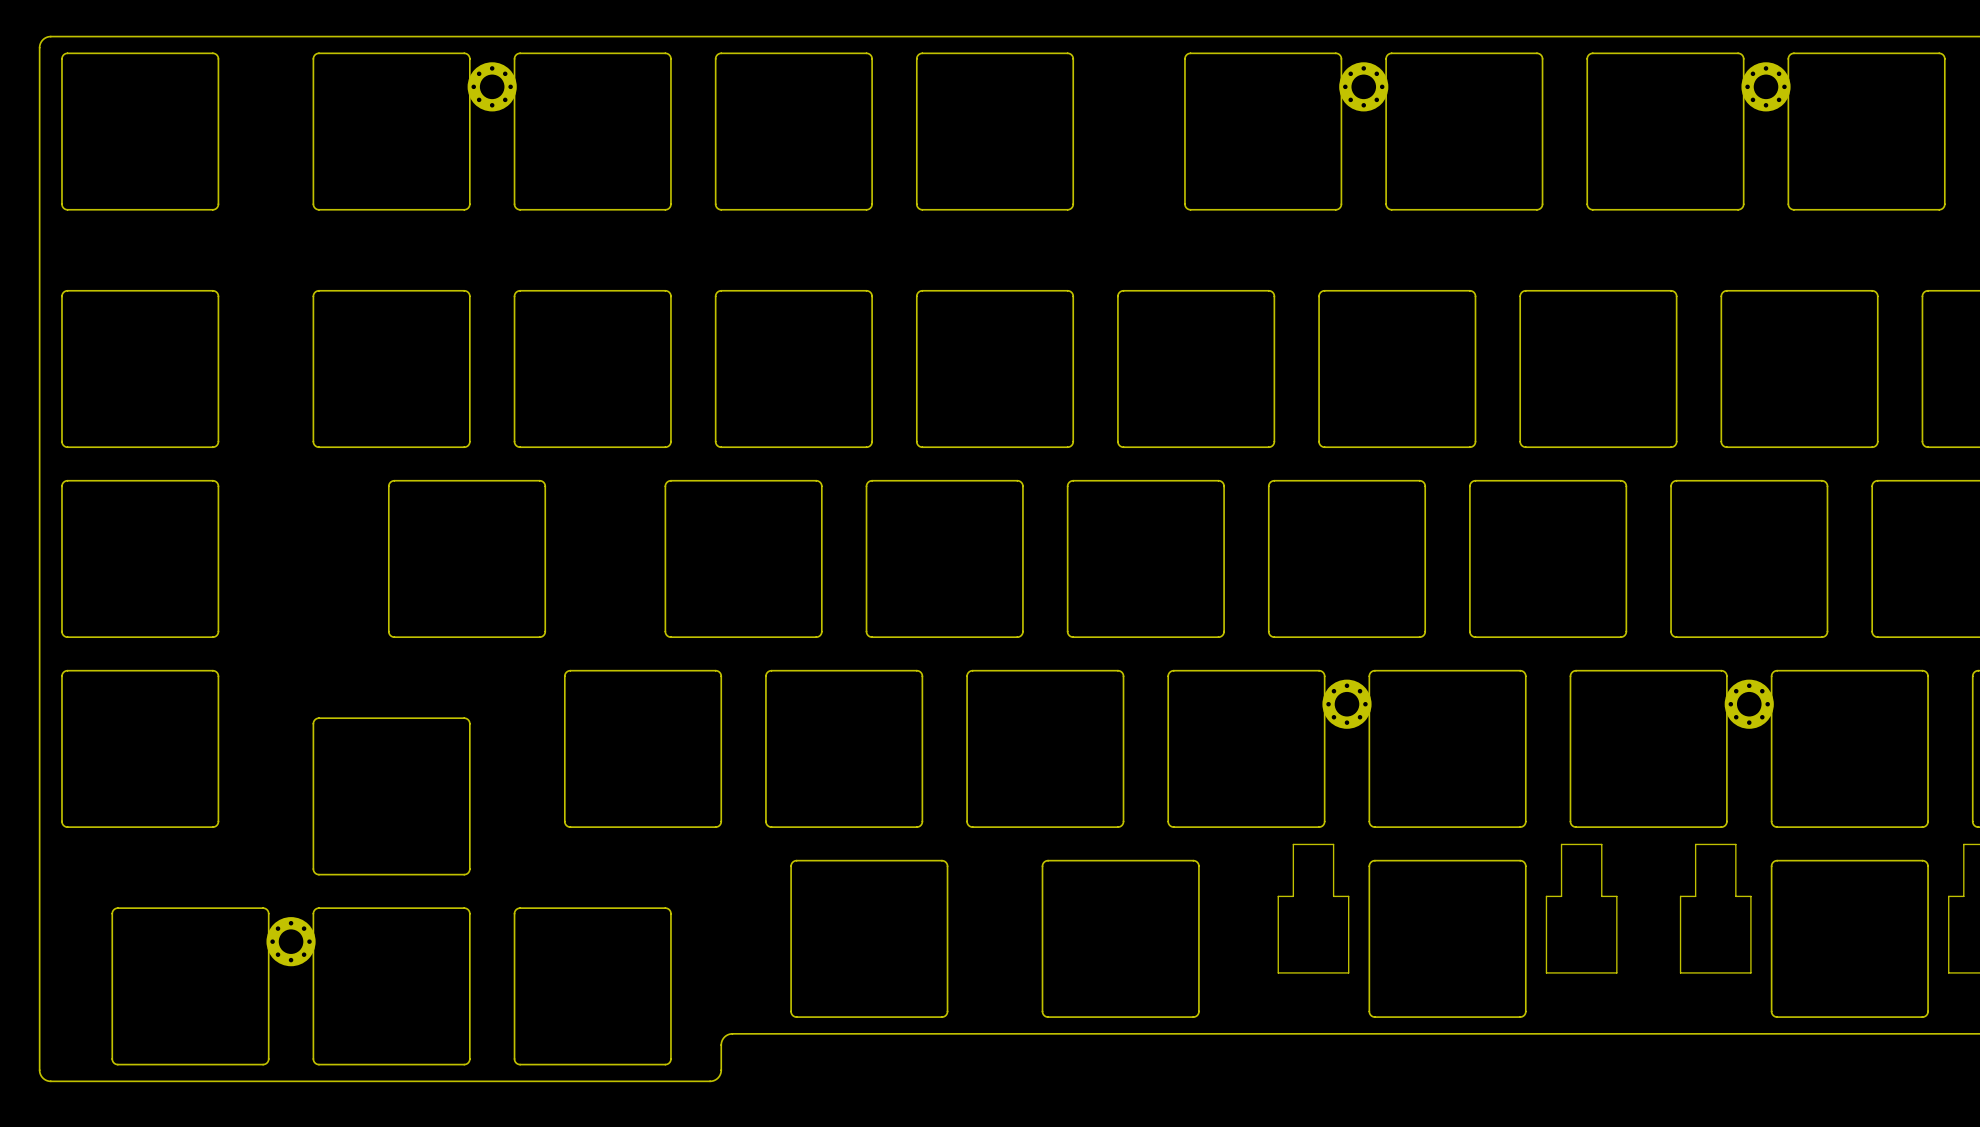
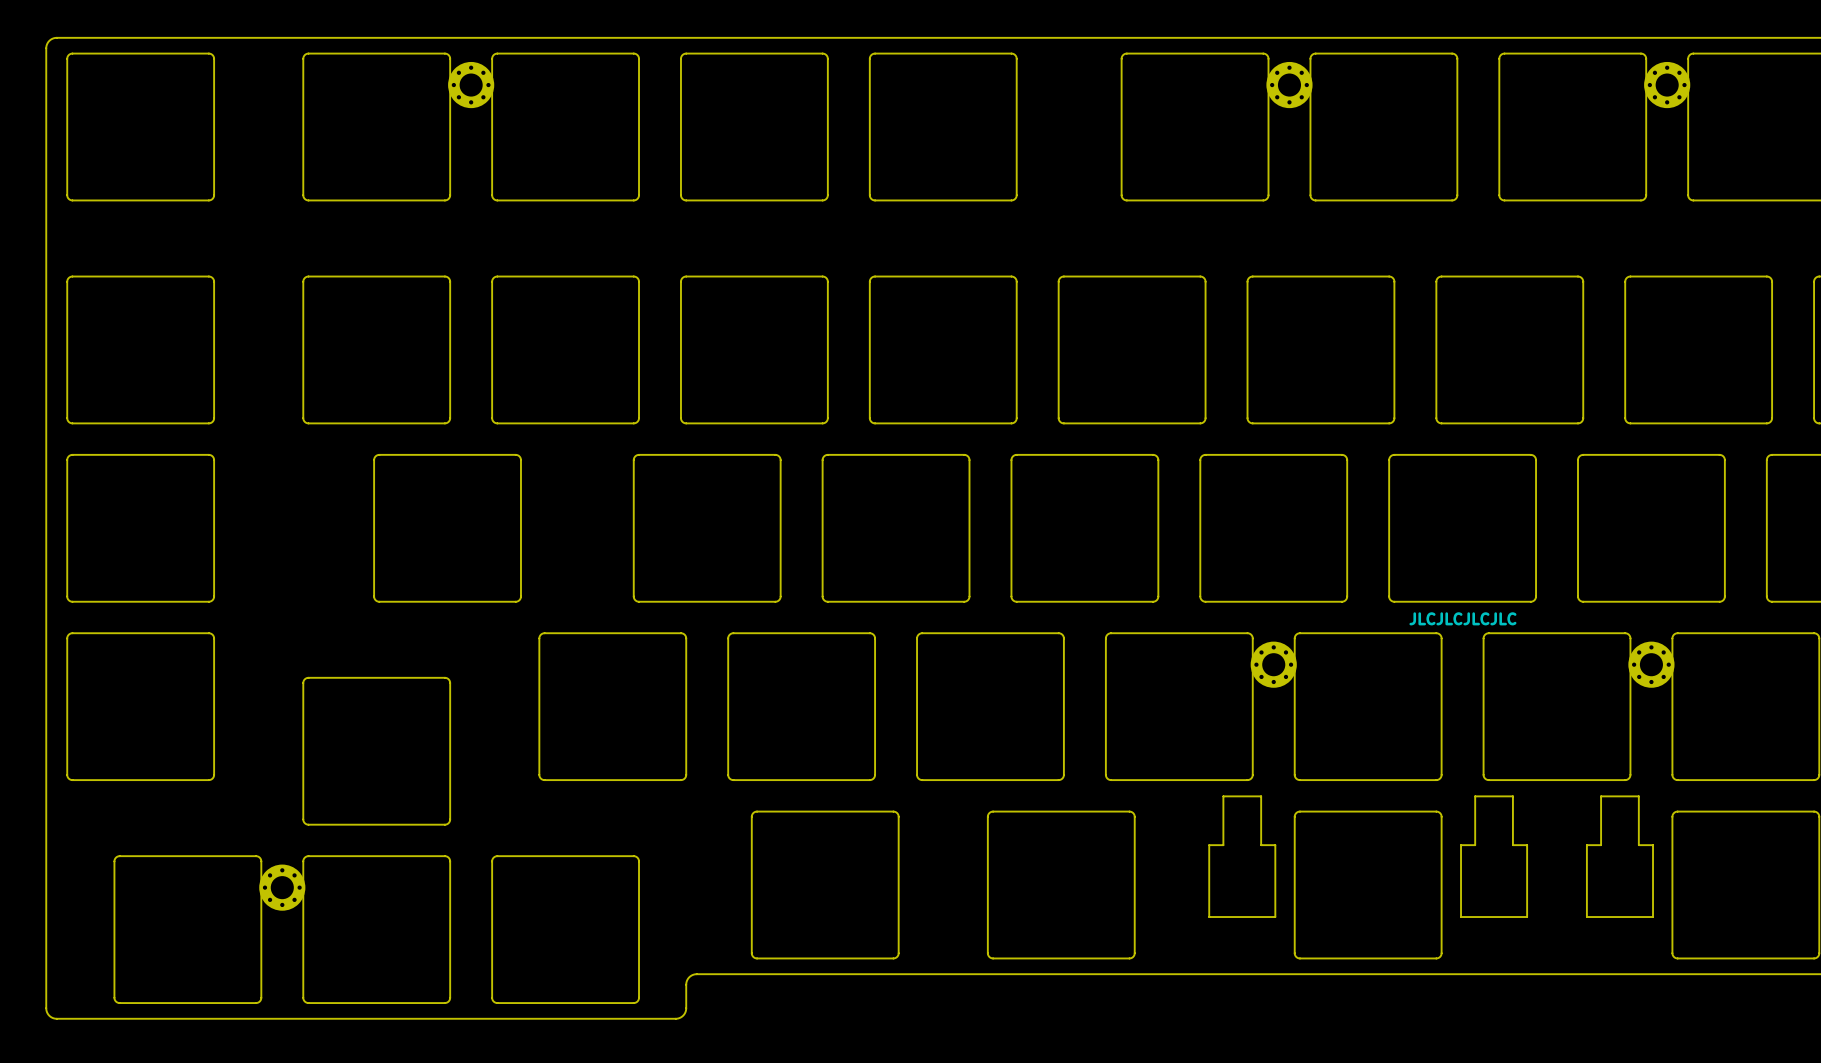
text: none -> JLCJLCJLCJLC (1462, 618)

